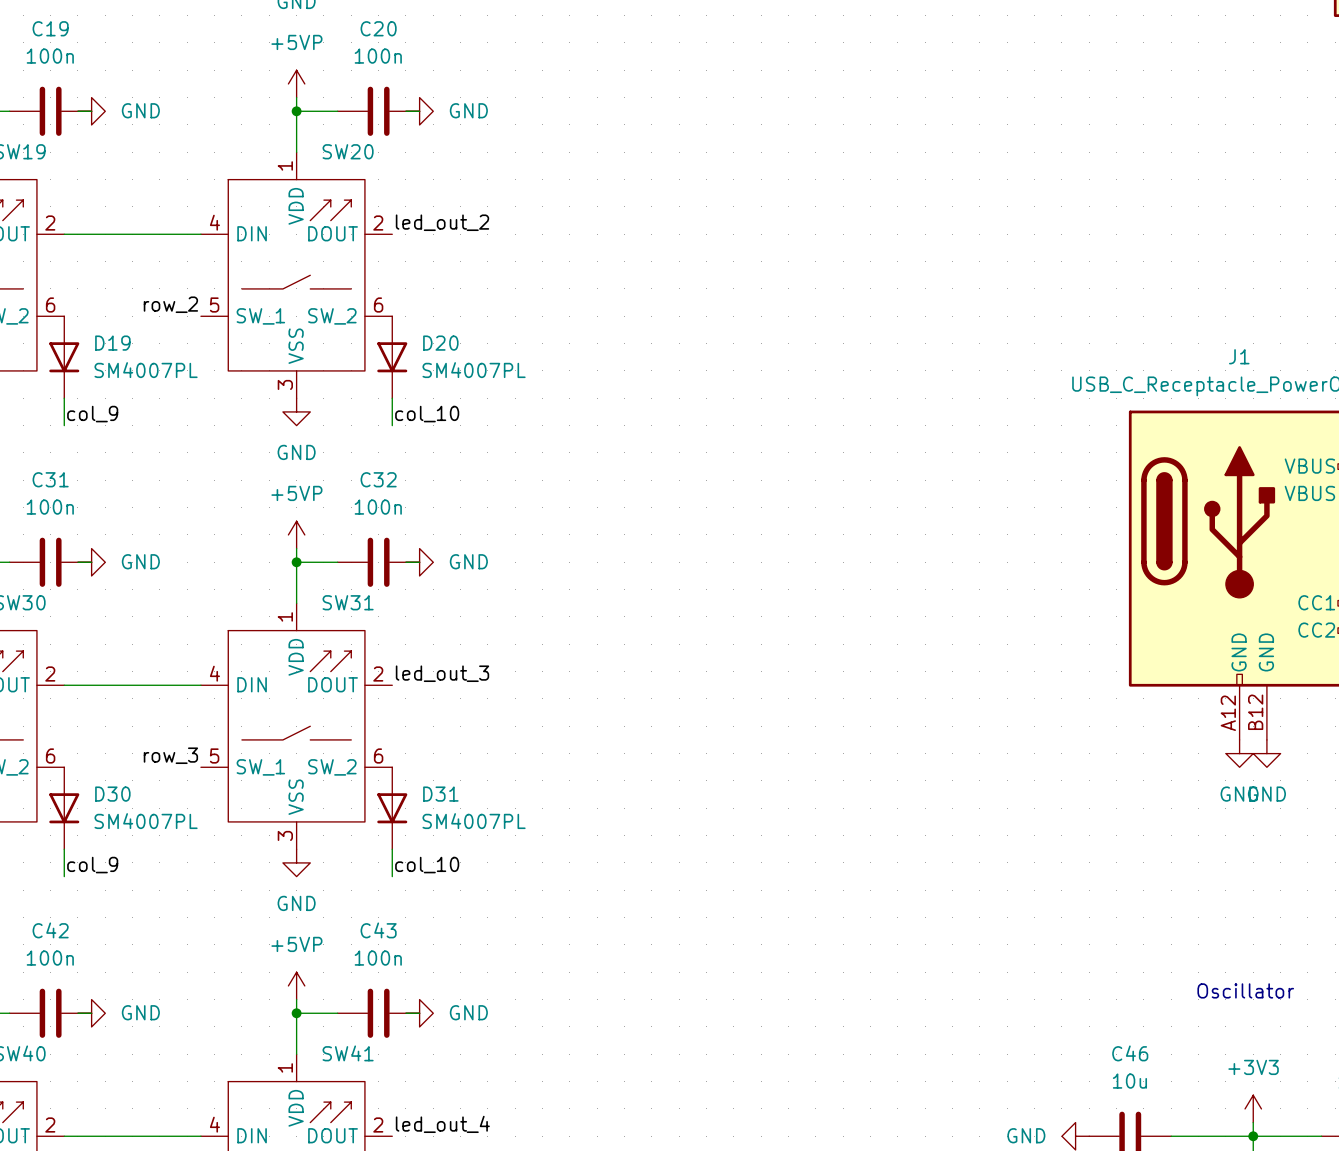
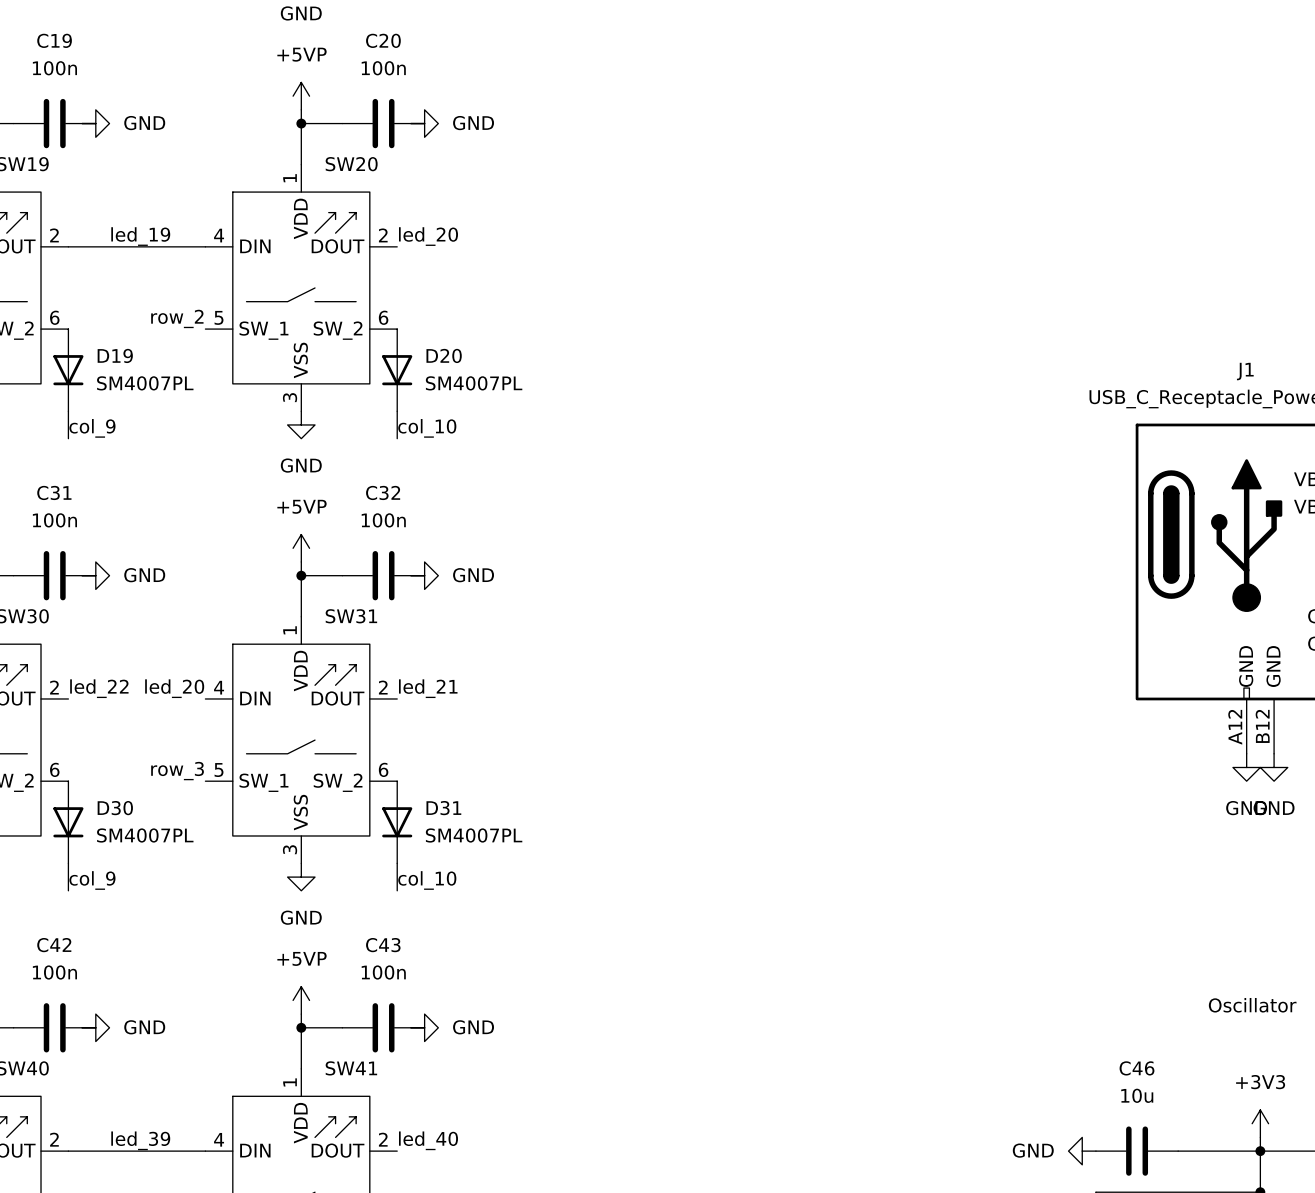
label: none -> led_19 (140, 236)
label: led_out_2 (442, 222) -> led_20 (428, 236)
label: none -> led_22 (99, 688)
label: none -> led_20 (174, 688)
label: led_out_3 (442, 673) -> led_21 (428, 688)
wire: (64, 685) (200, 685) -> none
label: none -> led_39 (140, 1140)
label: led_out_4 (442, 1124) -> led_40 (428, 1140)

